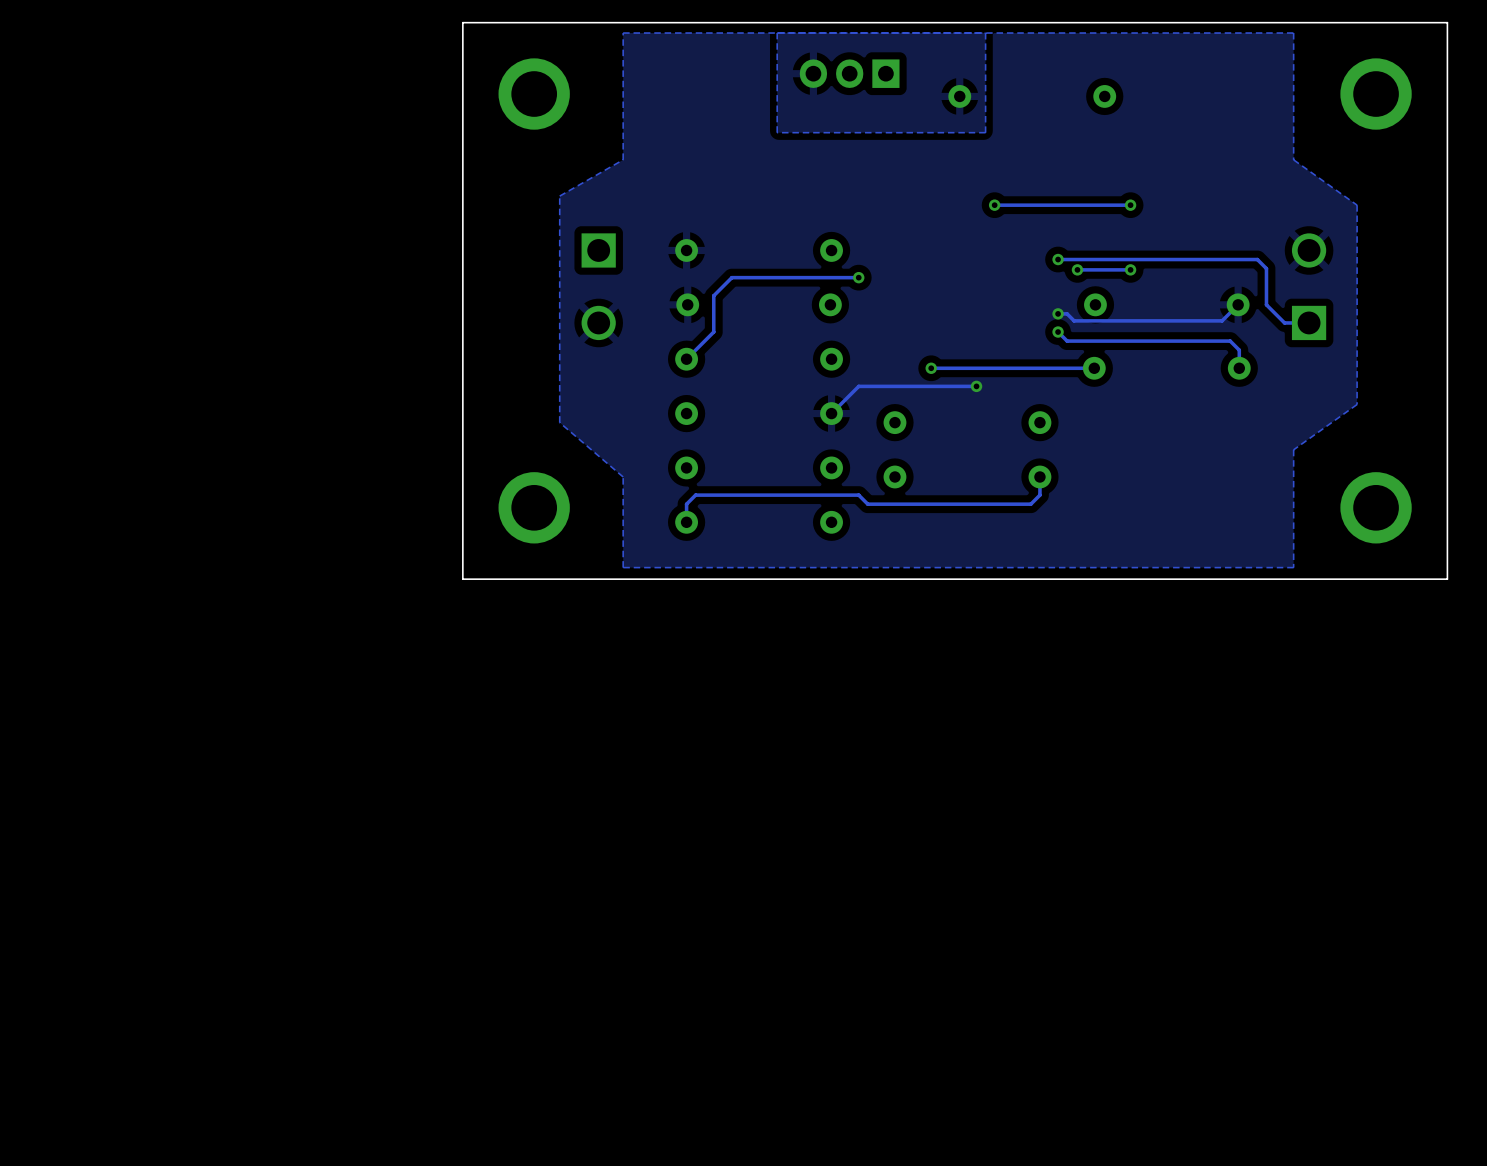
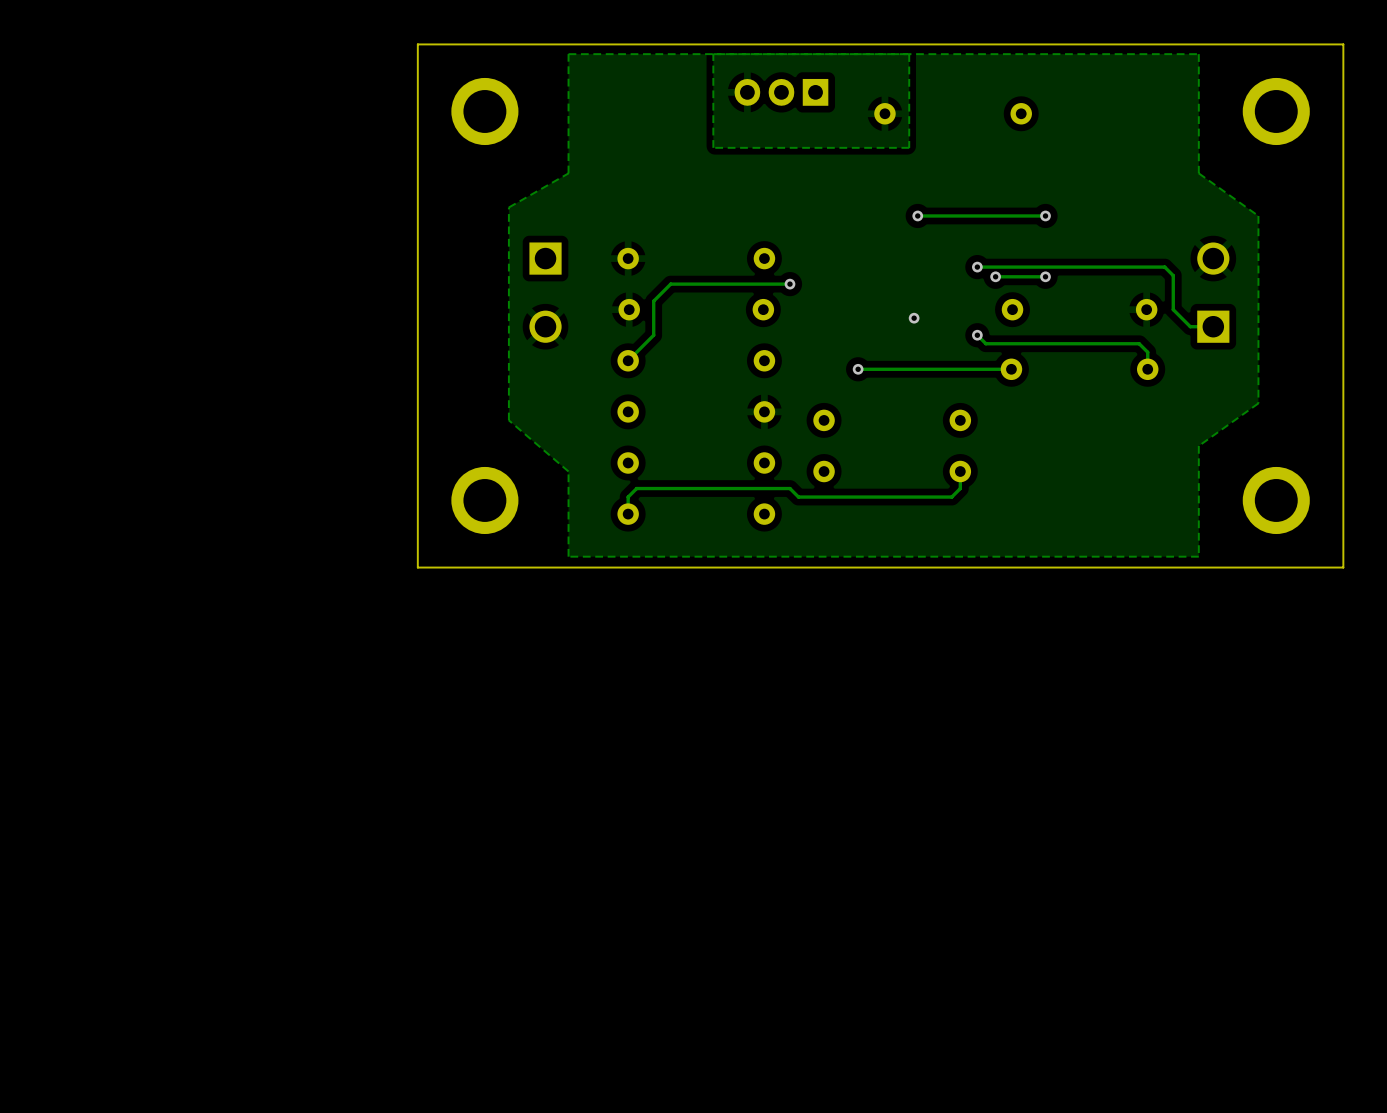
track: (1238, 304) (1222, 320) (1074, 320) (1067, 313) (1058, 313) -> none
via: none -> (914, 318)
via: (1058, 313) -> none
track: (976, 386) (858, 386) (831, 413) -> none
via: (976, 386) -> none

